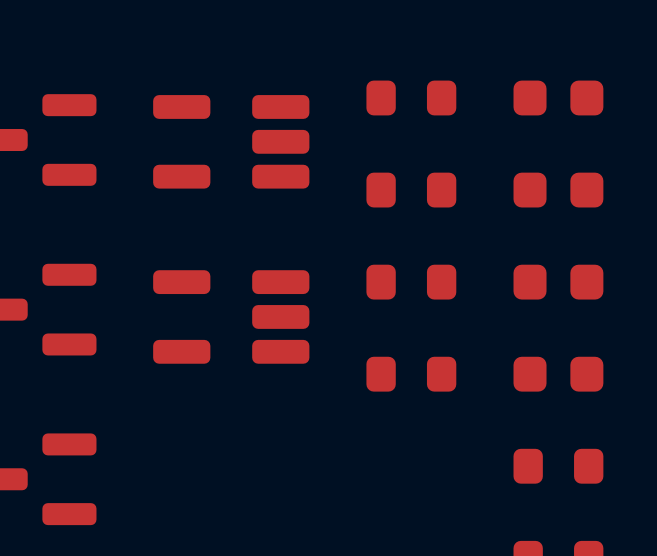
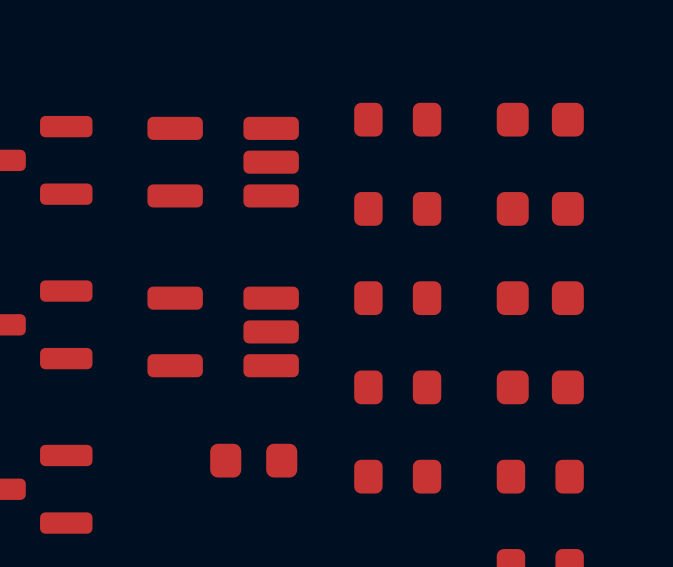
part: none -> (253, 460)
part: none -> (397, 476)

